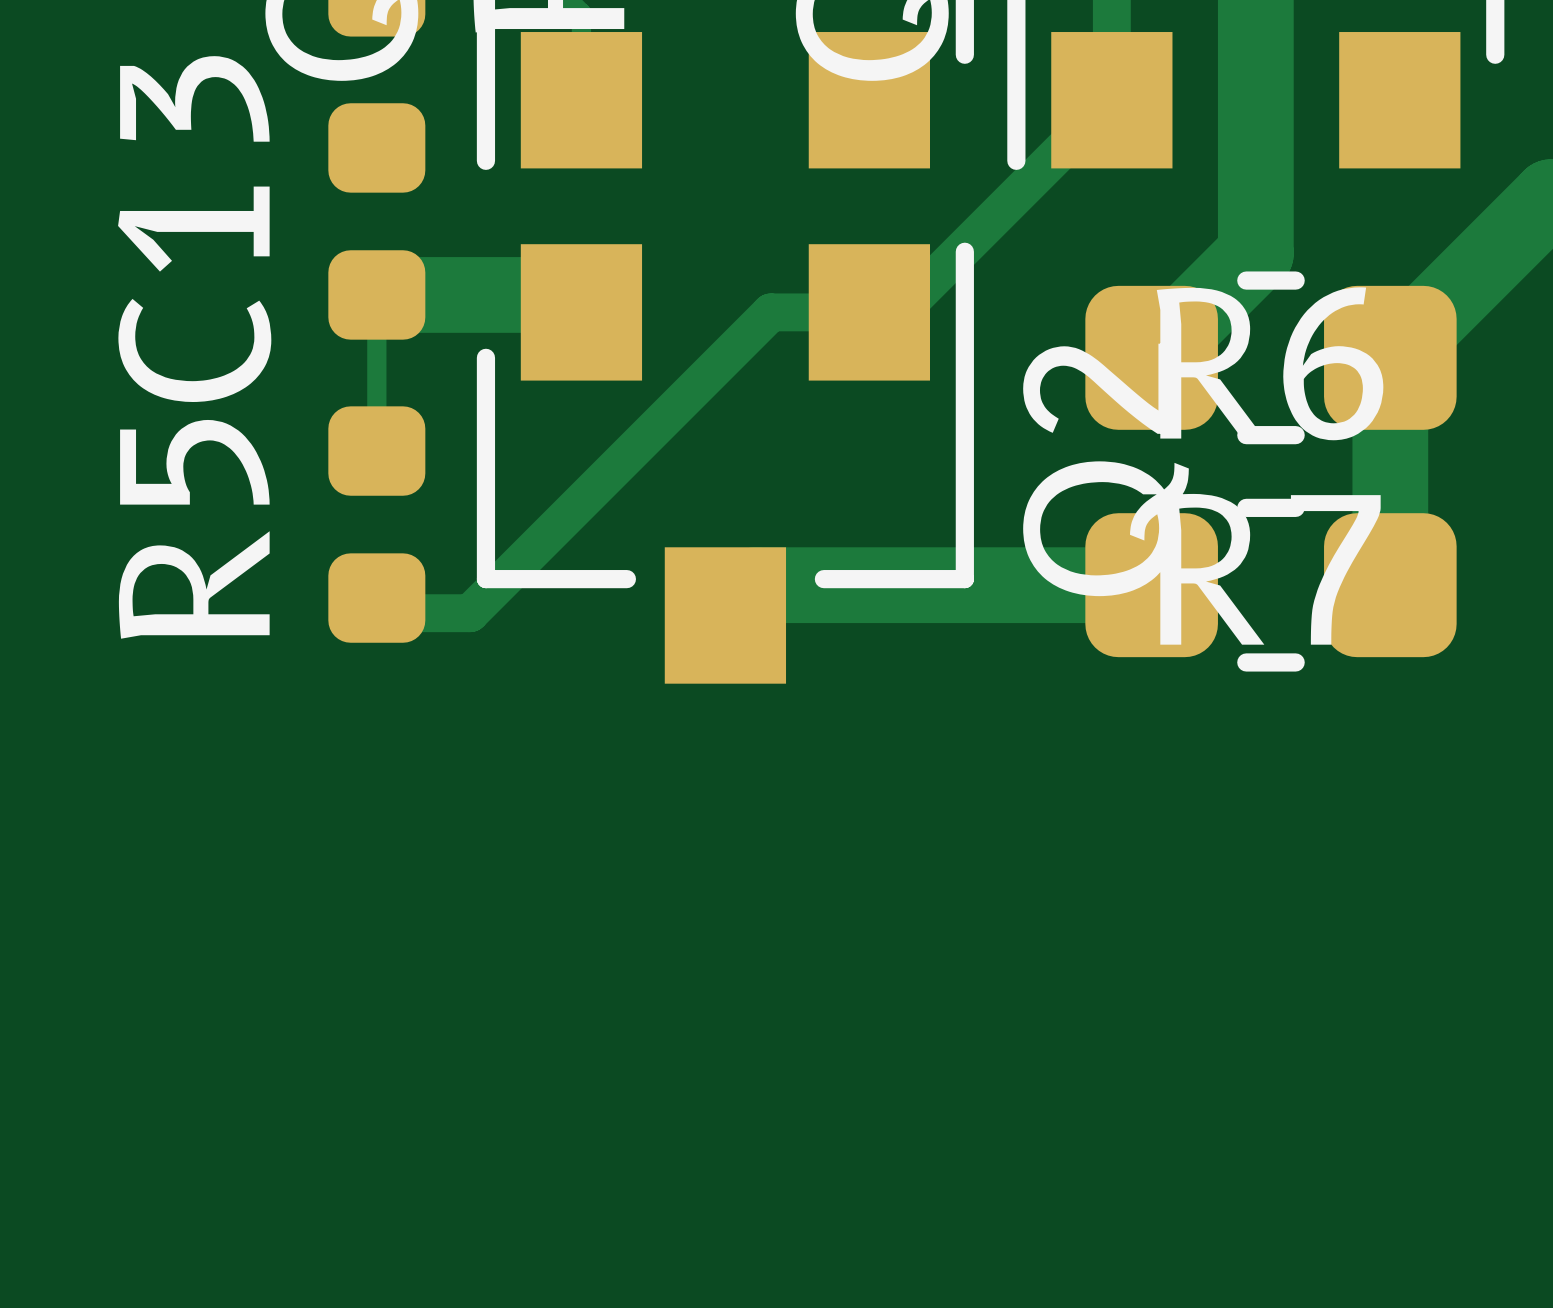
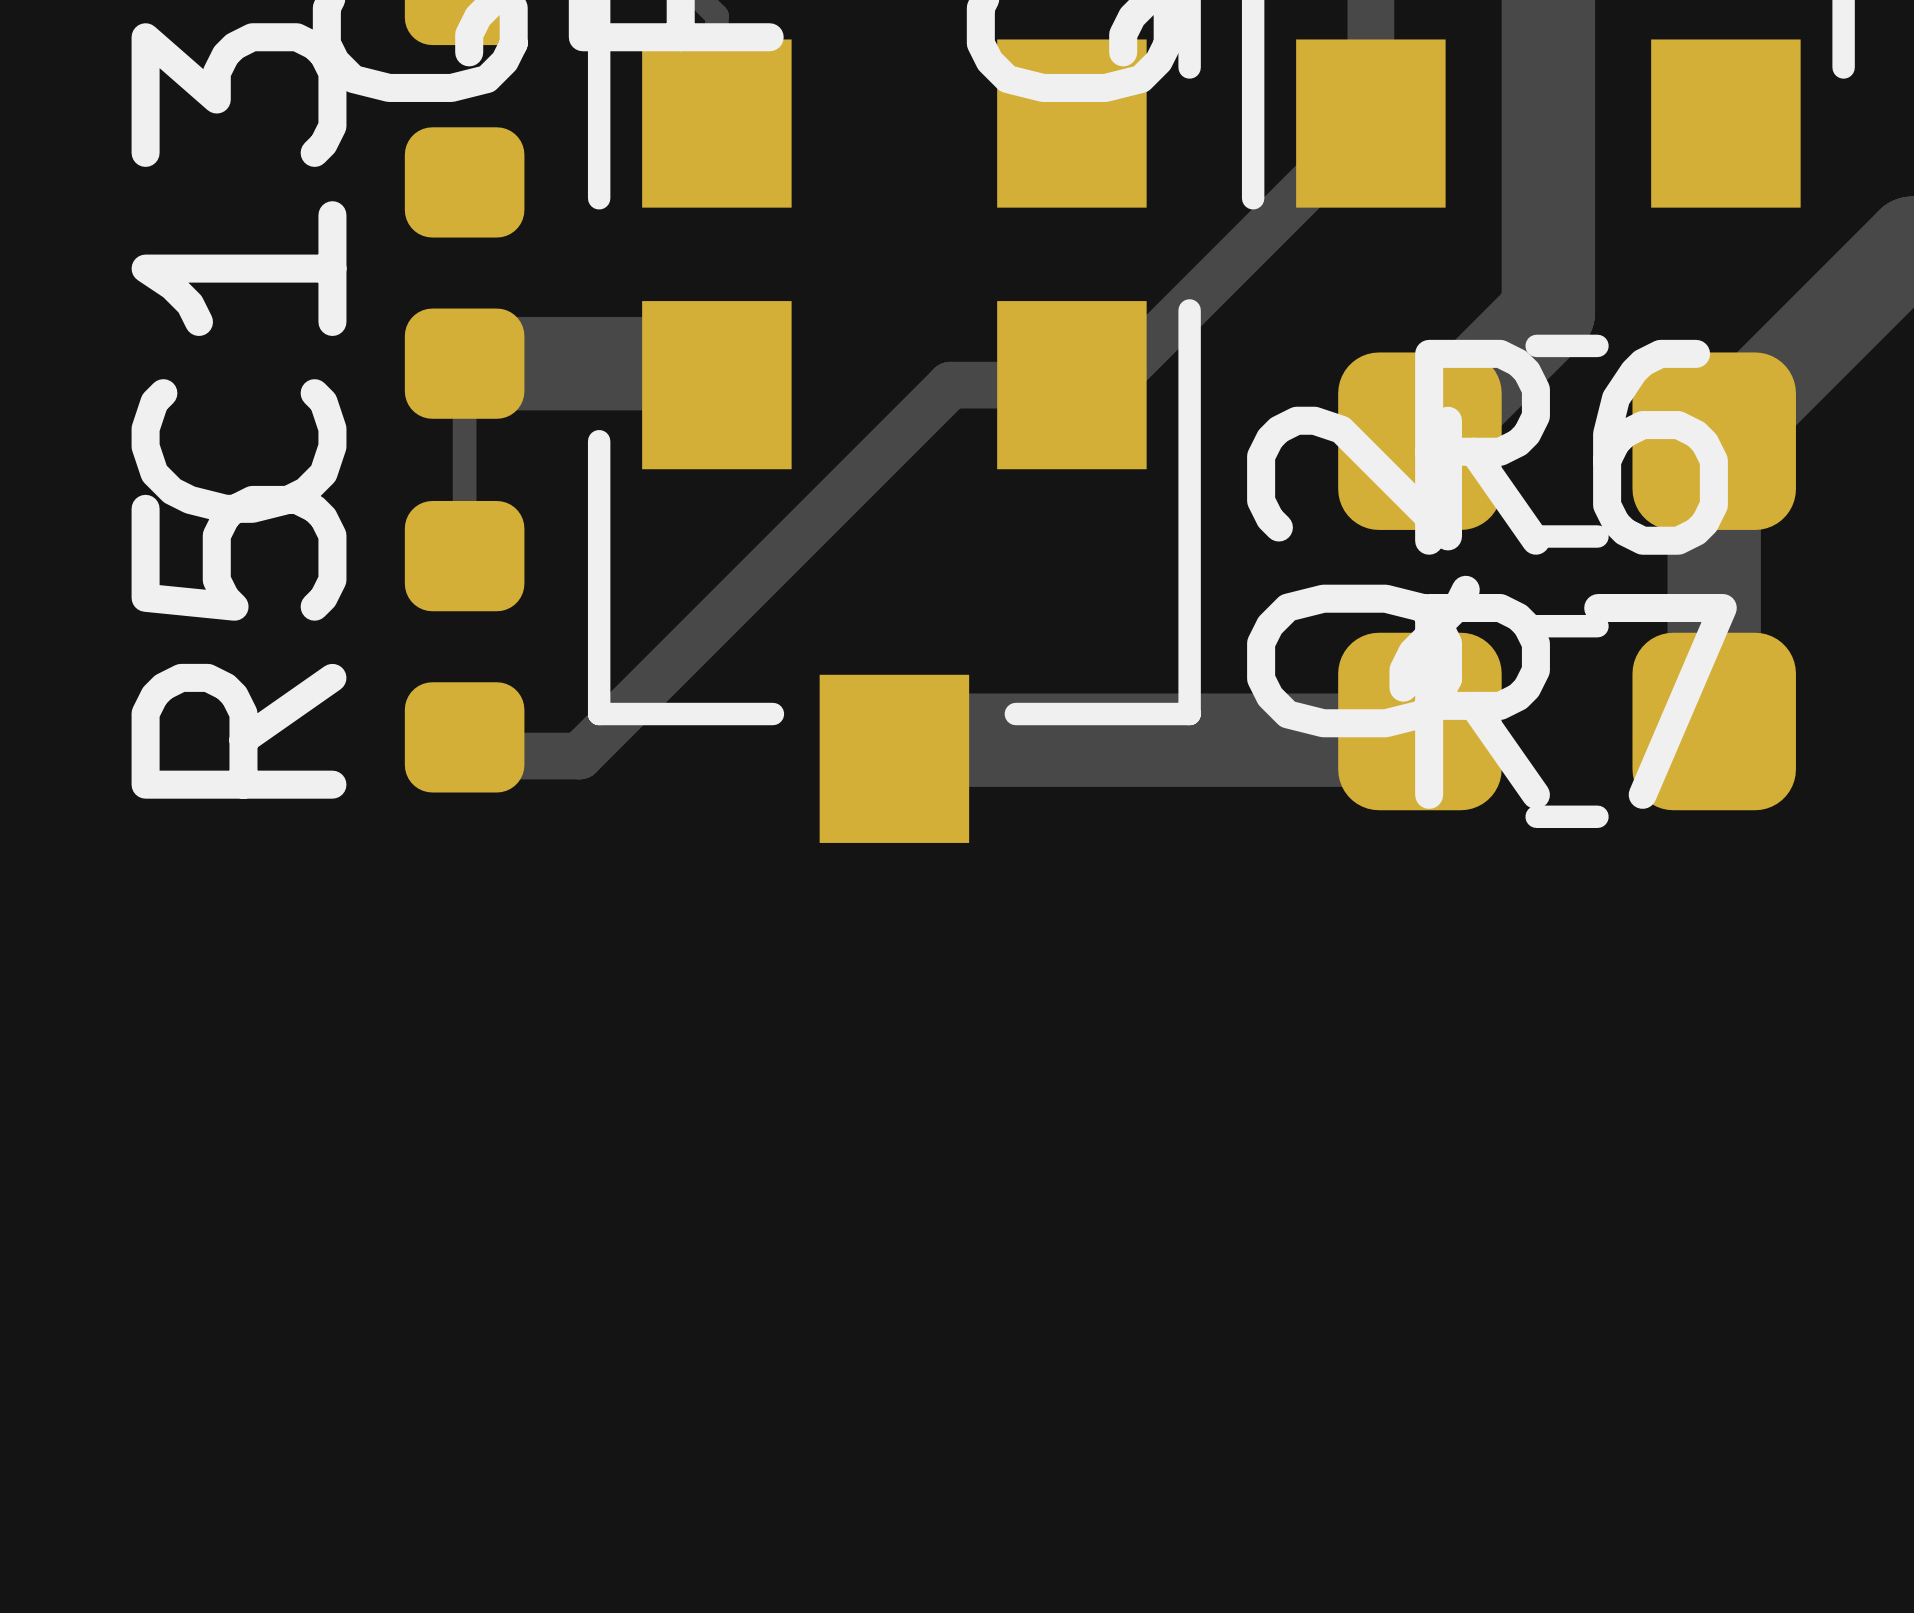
track: (1151, 585) (755, 585) (740, 600) -> (1419, 740) (913, 740)

